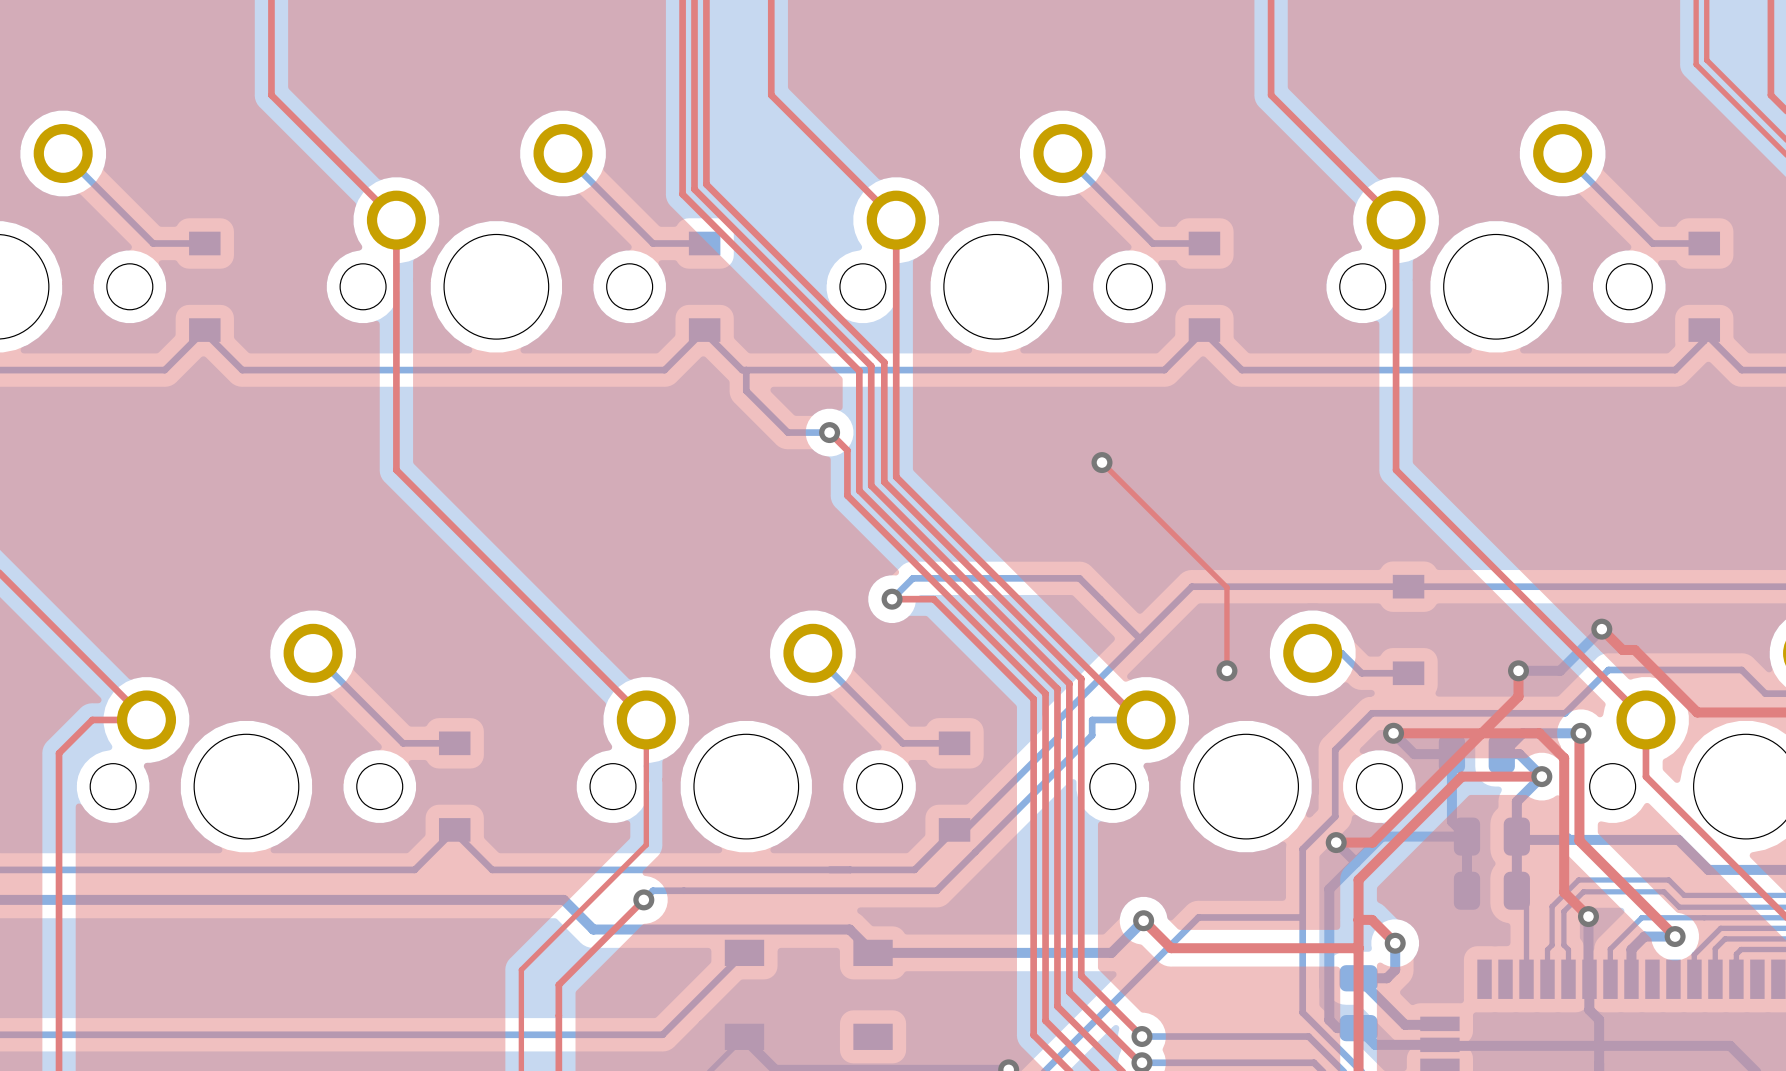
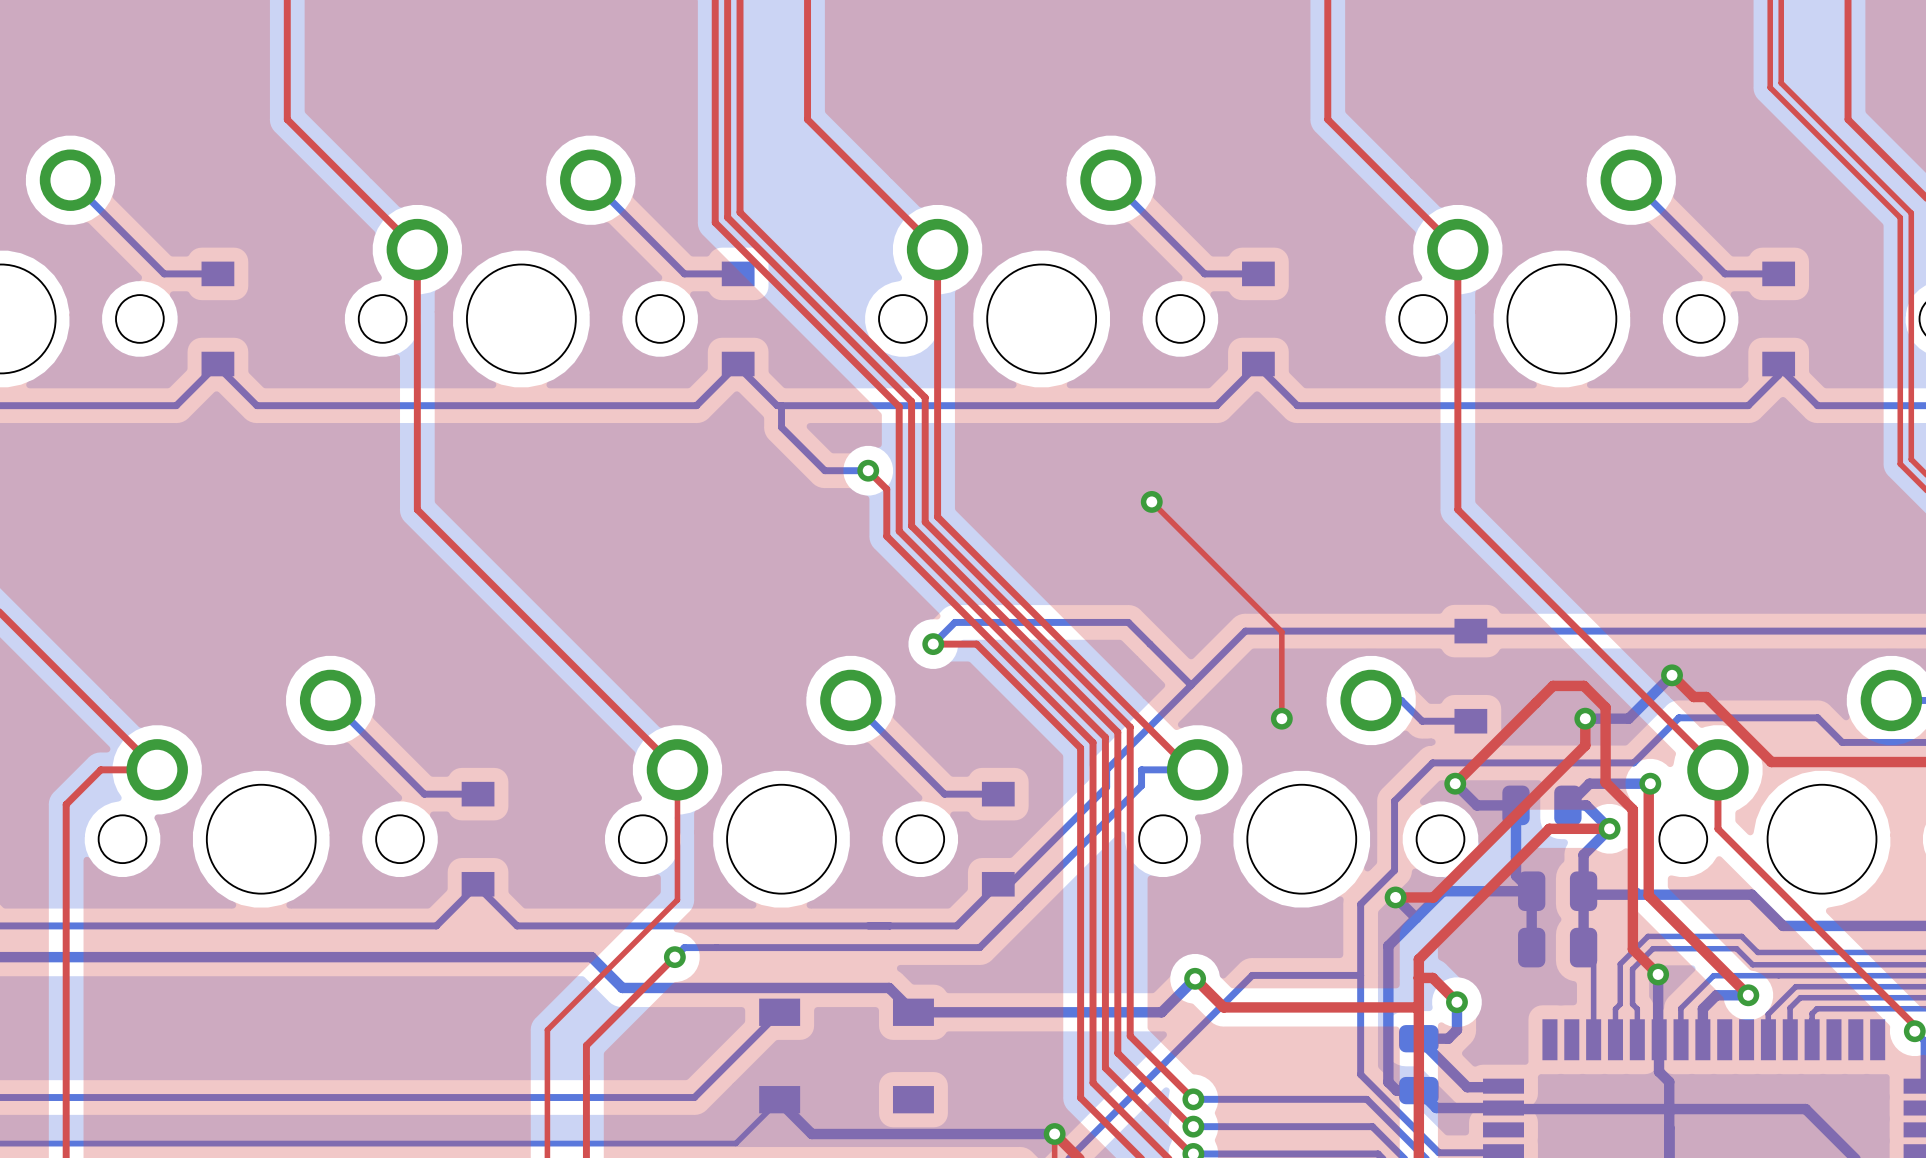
top track: (1393, 733) (1539, 733) -> (1455, 783) (1553, 685) (1583, 685) (1605, 707) (1606, 783)
top track: (1484, 776) (1461, 776) (1358, 879) (1358, 902) -> (1549, 828) (1418, 959)

